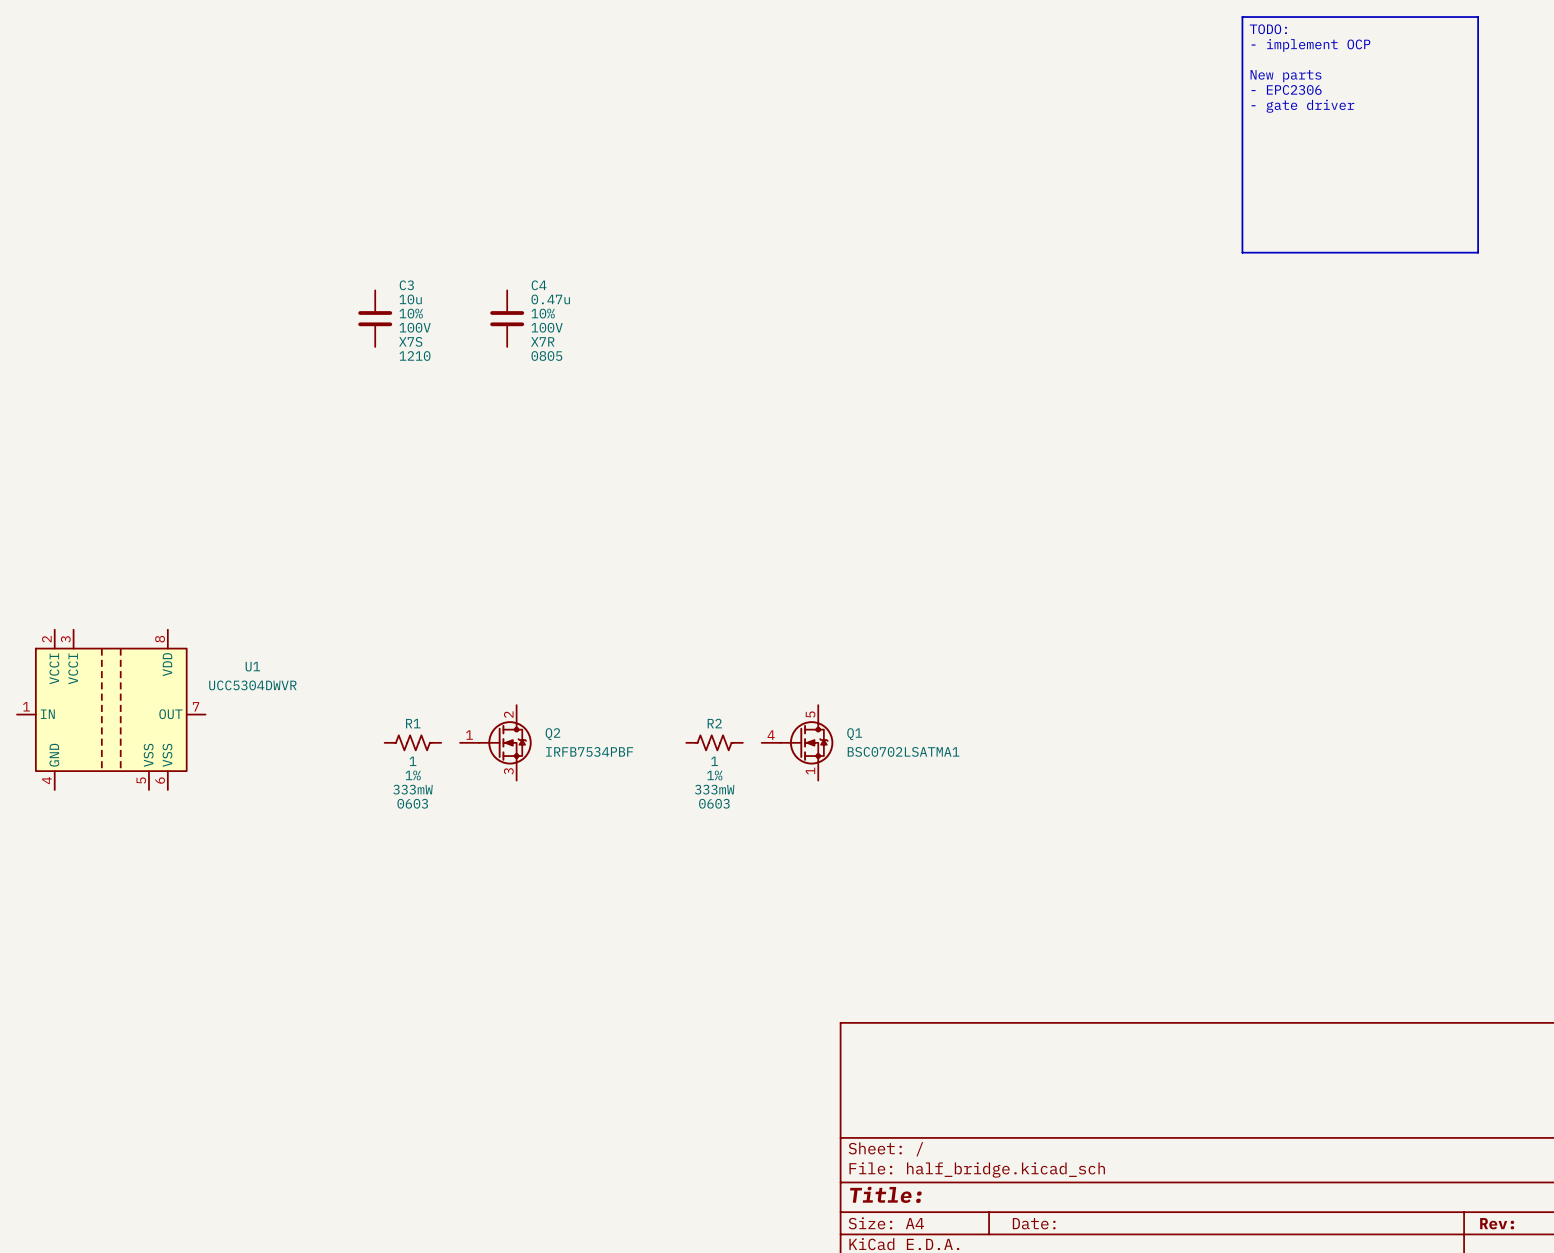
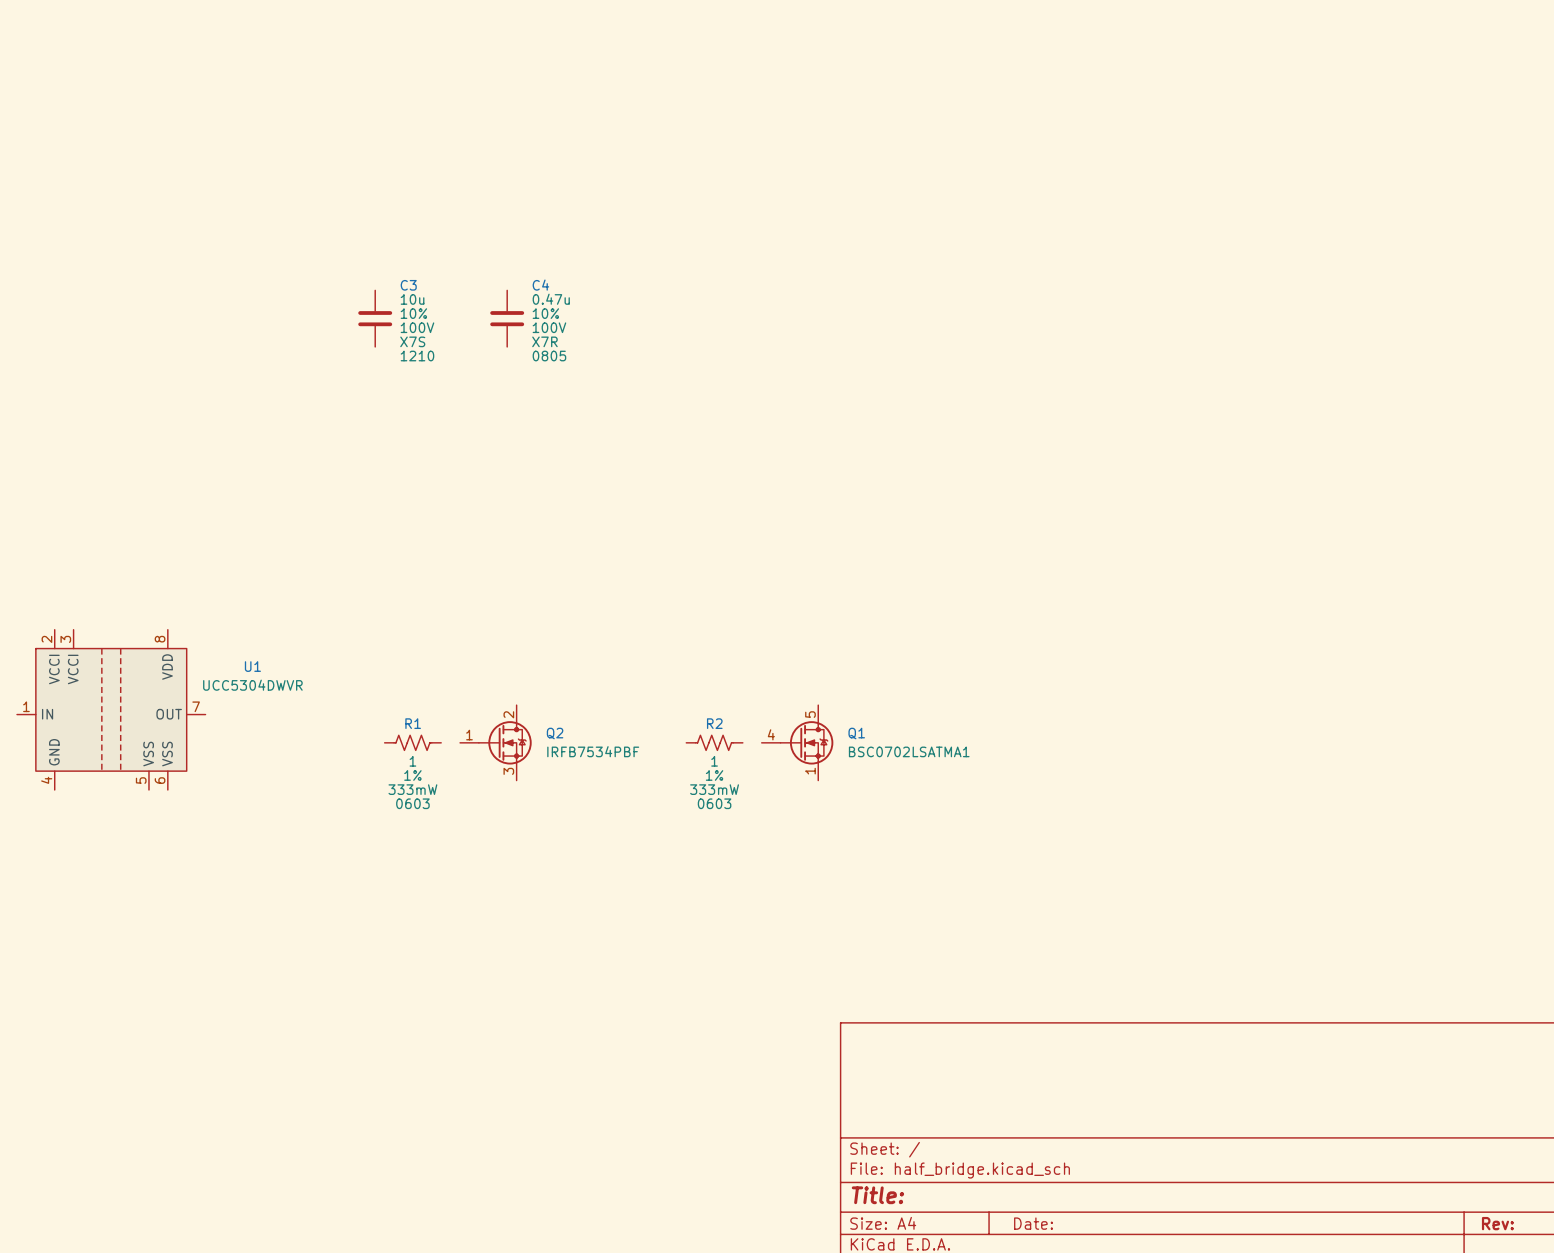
line: (1242, 17) (1478, 17) (1478, 252) (1242, 252) (1242, 17) -> none
text: TODO: (1268, 29) -> none
text: - implement OCP (1310, 45) -> none
text: New parts (1286, 76) -> none
text: - EPC2306 (1286, 89) -> none
text: - gate driver (1302, 106) -> none

